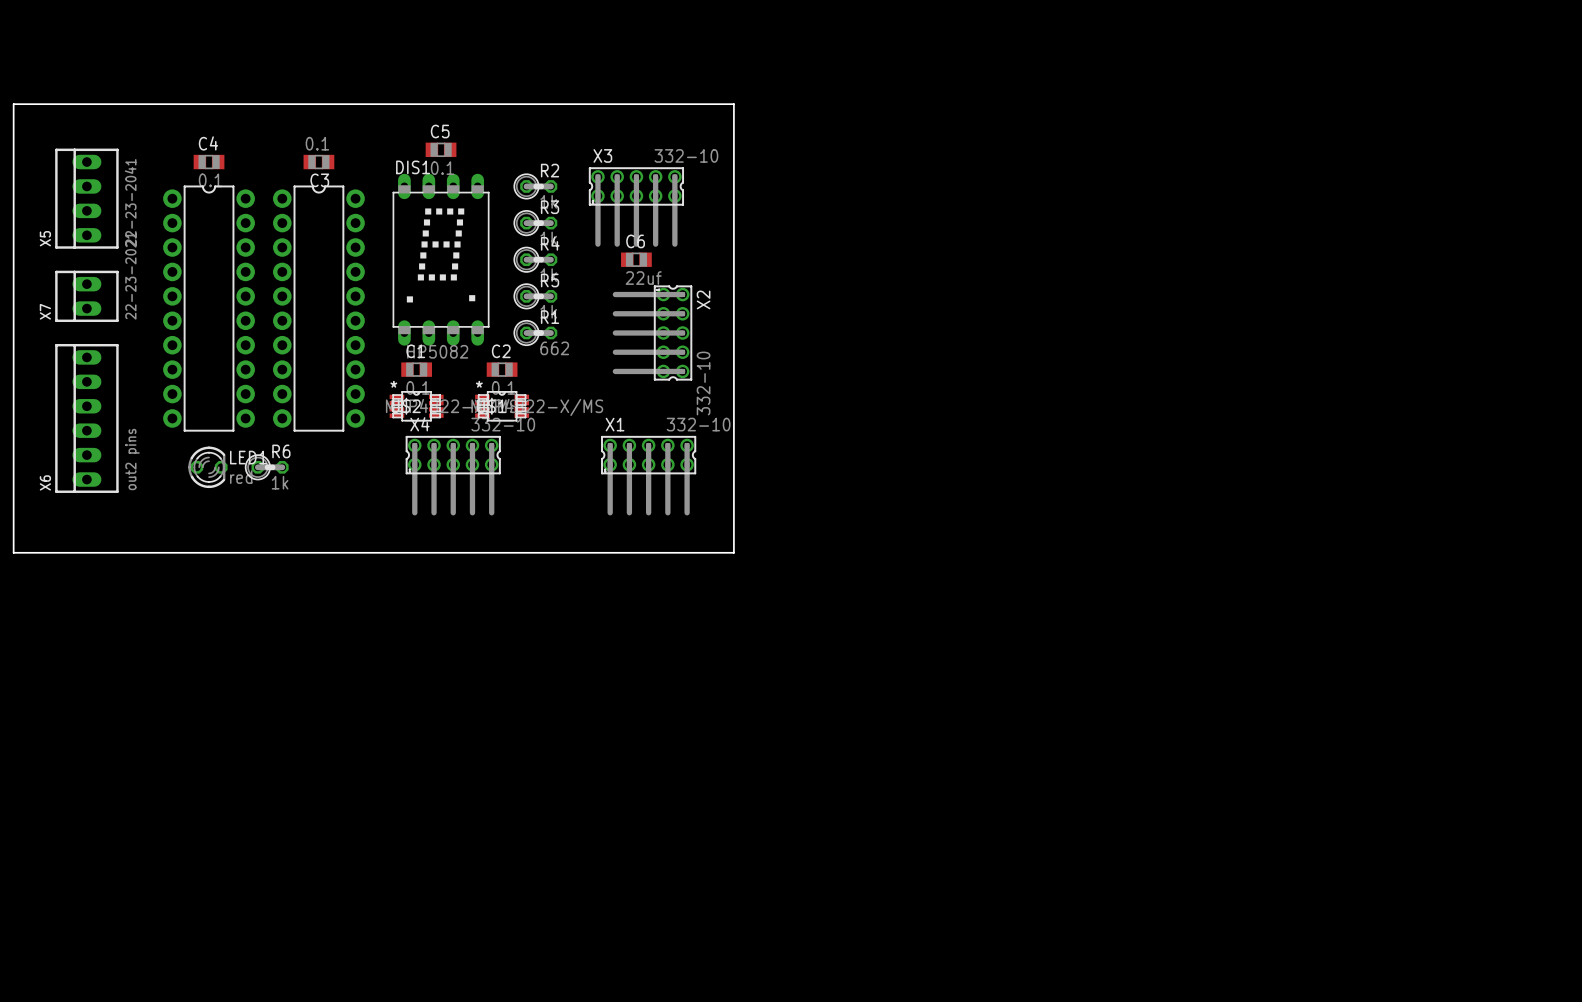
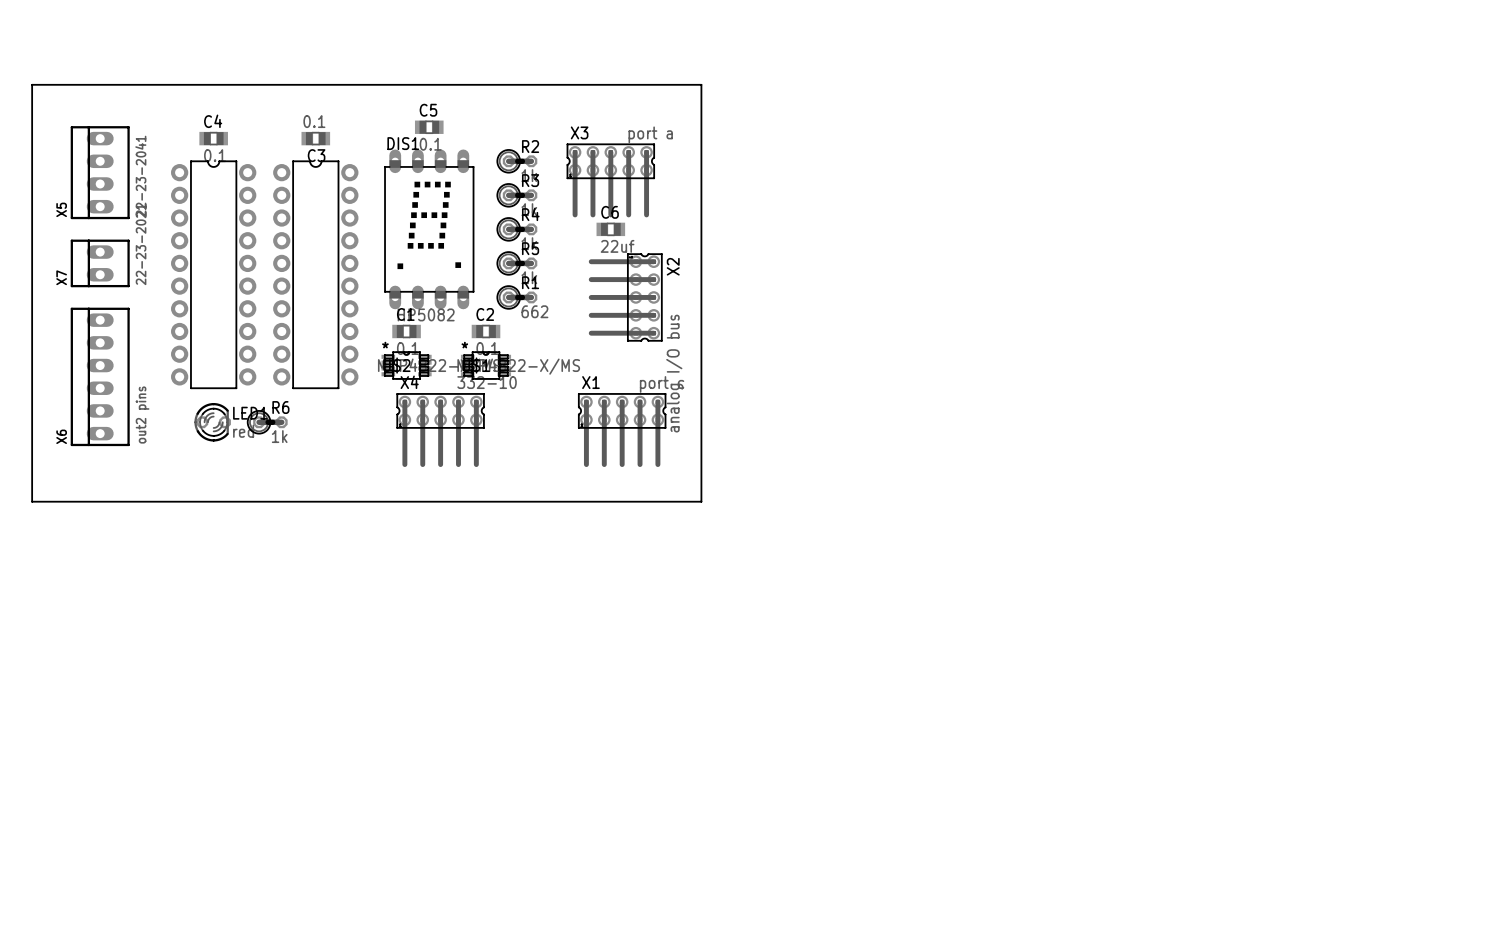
X3 value: 332-10 (686, 155) -> port a (650, 134)
X2 value: 332-10 (703, 383) -> analog I/O bus (674, 373)
X1 value: 332-10 (698, 424) -> port c (662, 384)

